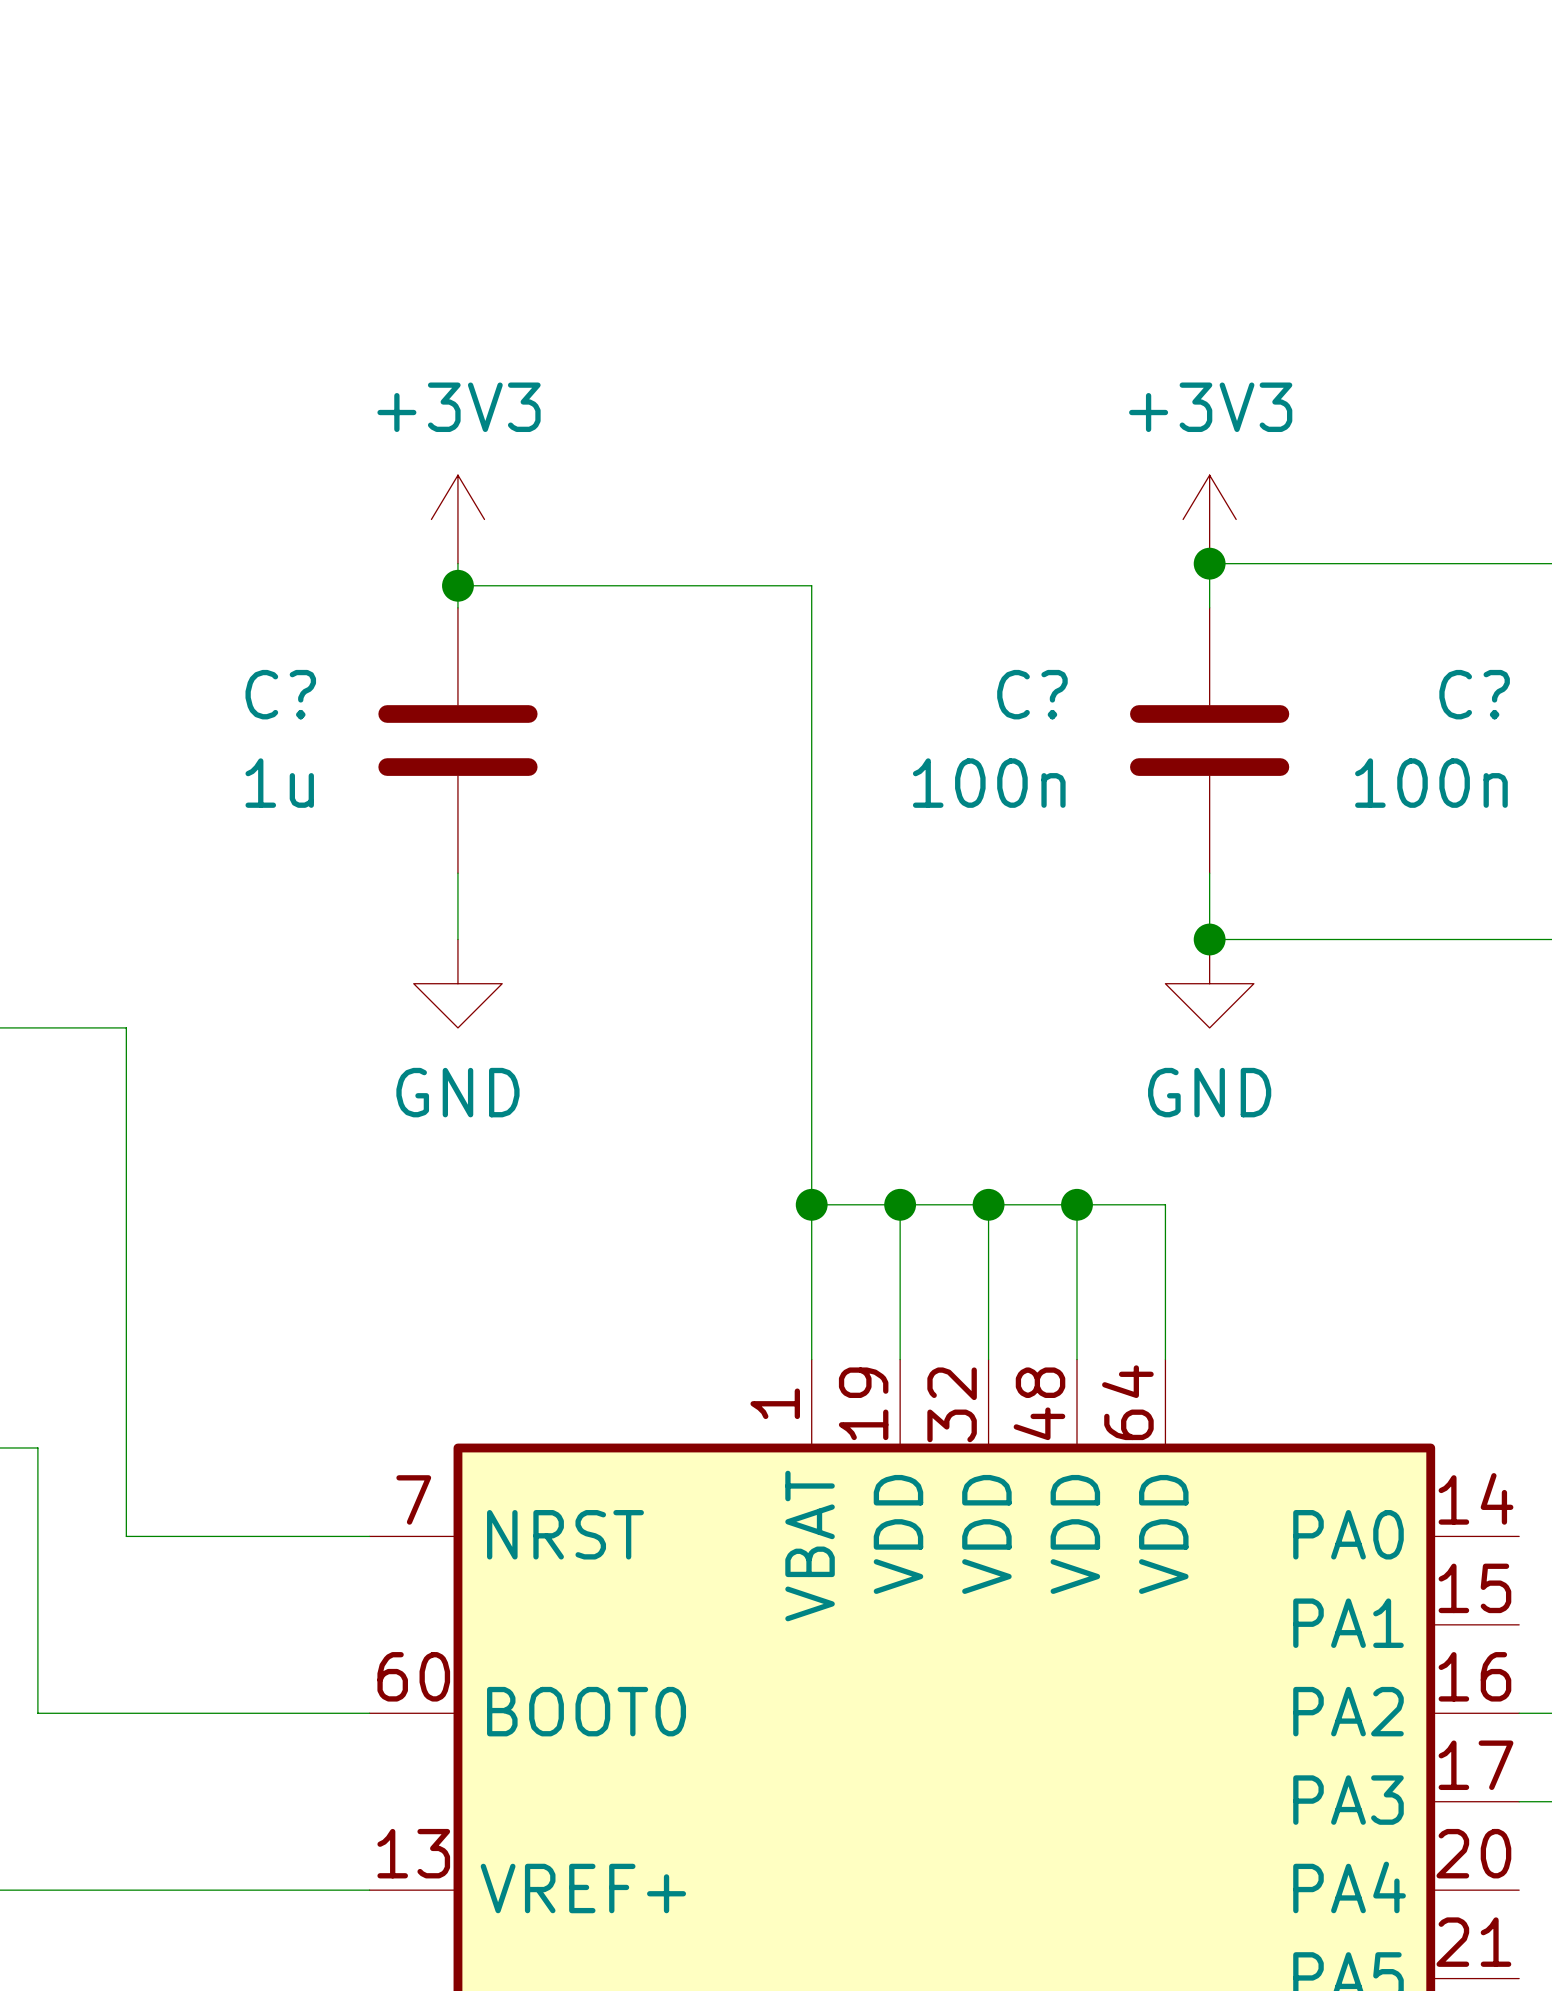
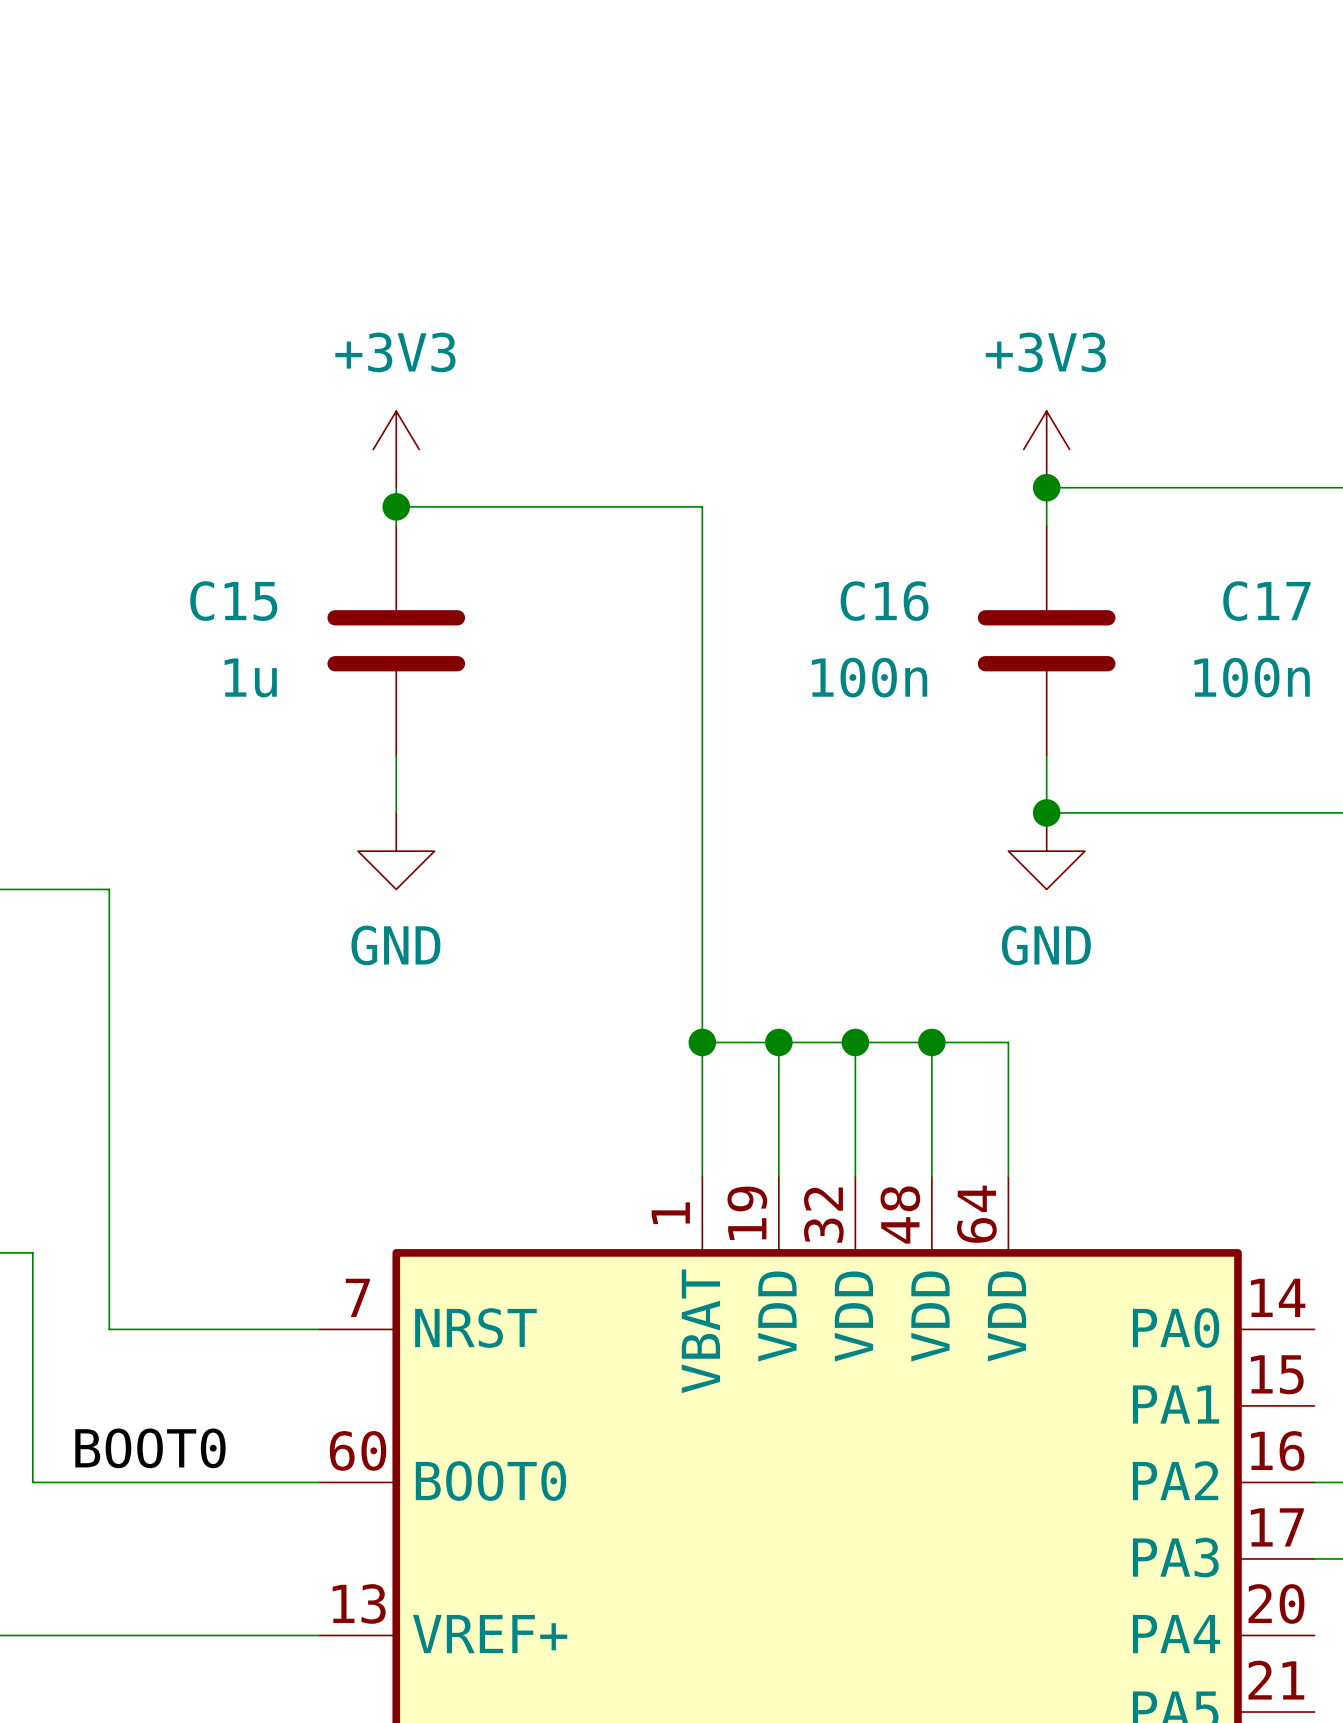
C? name: C? (280, 694) -> C15 (233, 601)
C? name: C? (1032, 694) -> C16 (884, 601)
C? name: C? (1474, 694) -> C17 (1266, 601)
label: none -> BOOT0 (150, 1448)

